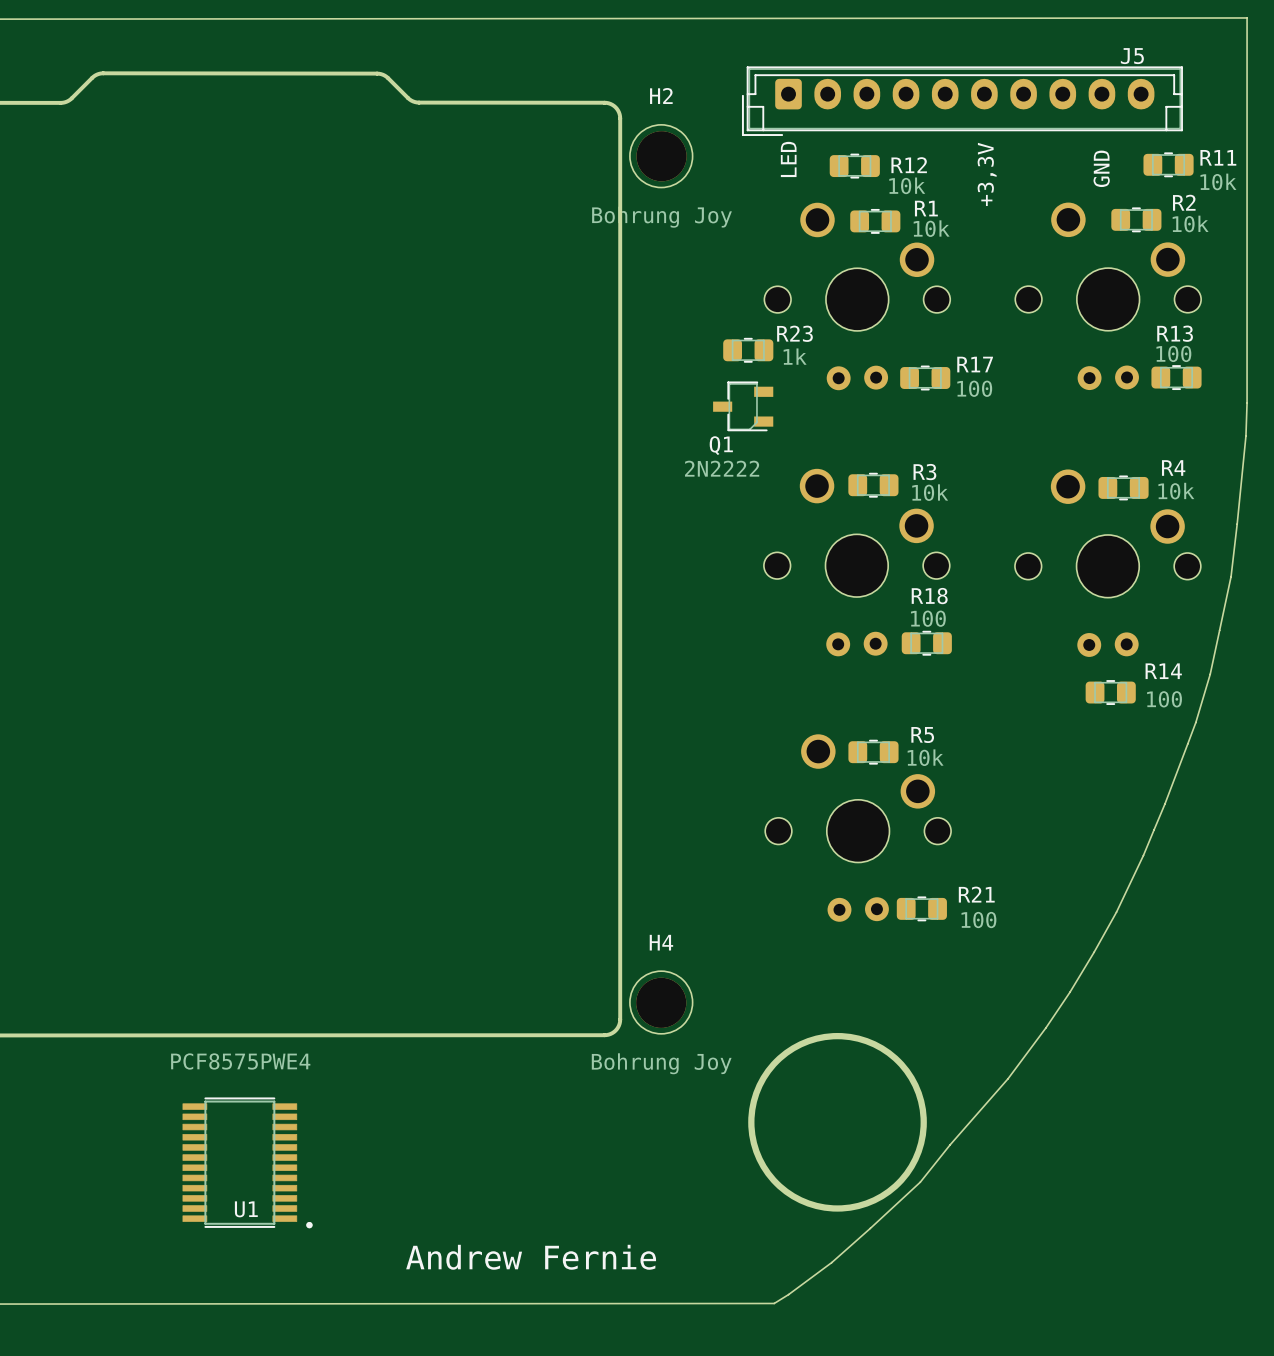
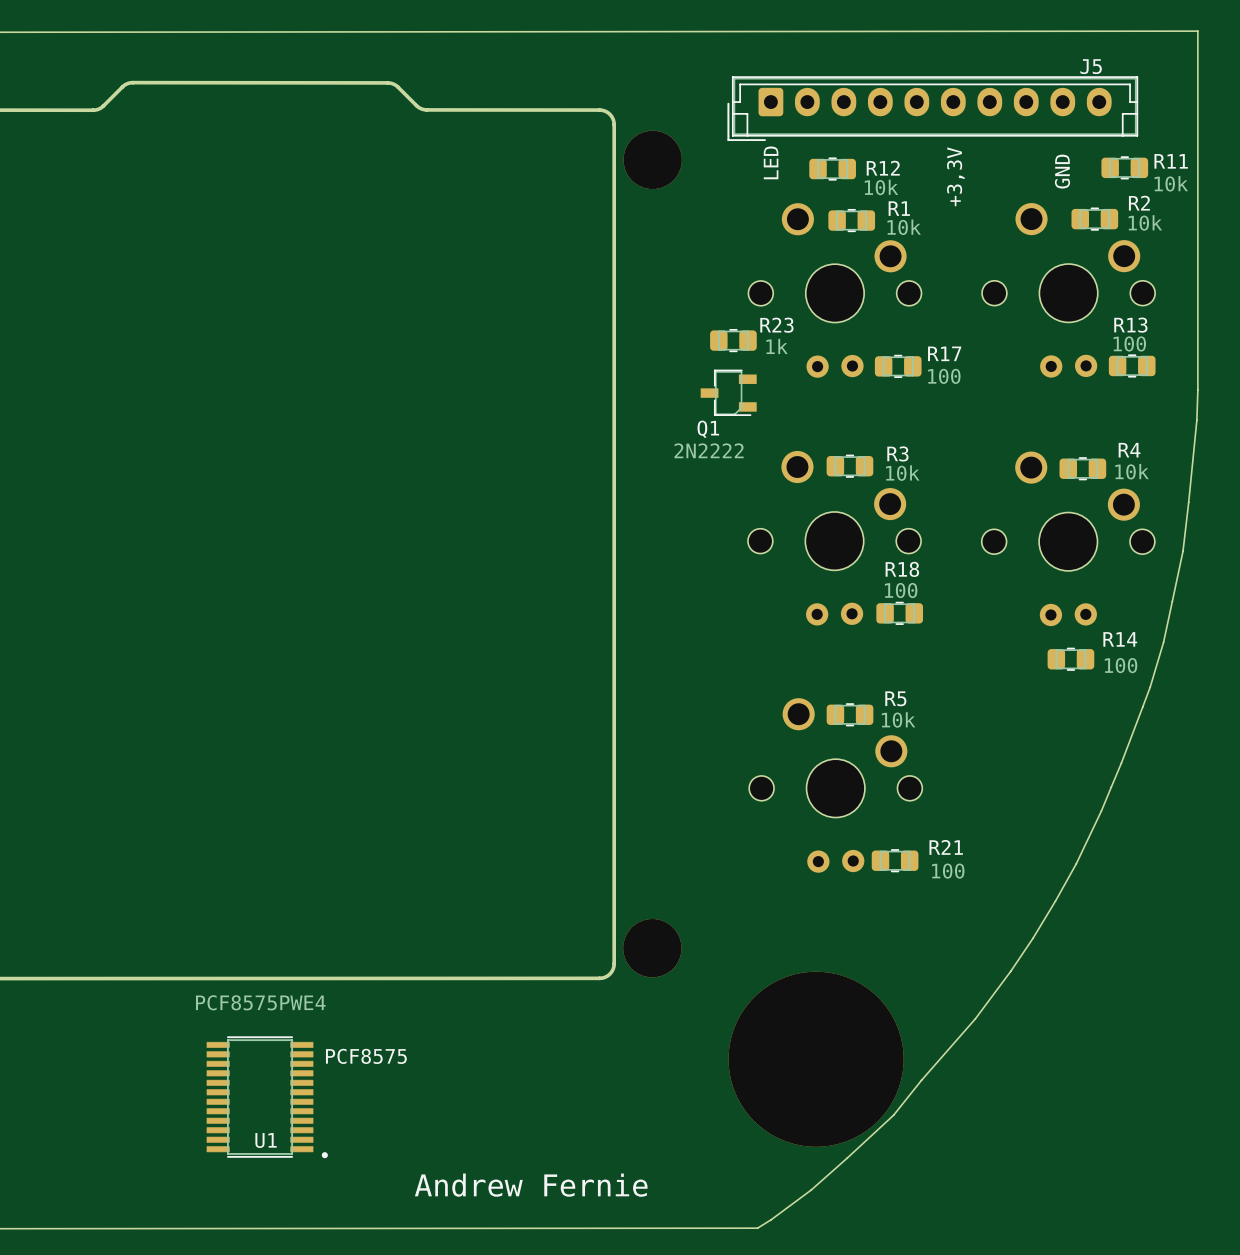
round board edge: [629, 124, 694, 189] -> none
H2: Bohrung Joy (661, 156) -> none
part: none -> (652, 159)
round board edge: [629, 970, 694, 1035] -> none
H4: Bohrung Joy (661, 1002) -> none
part: none -> (652, 948)
round board edge: [748, 1032, 927, 1212] -> none
text: none -> PCF8575 (366, 1056)
part: none -> (816, 1059)

